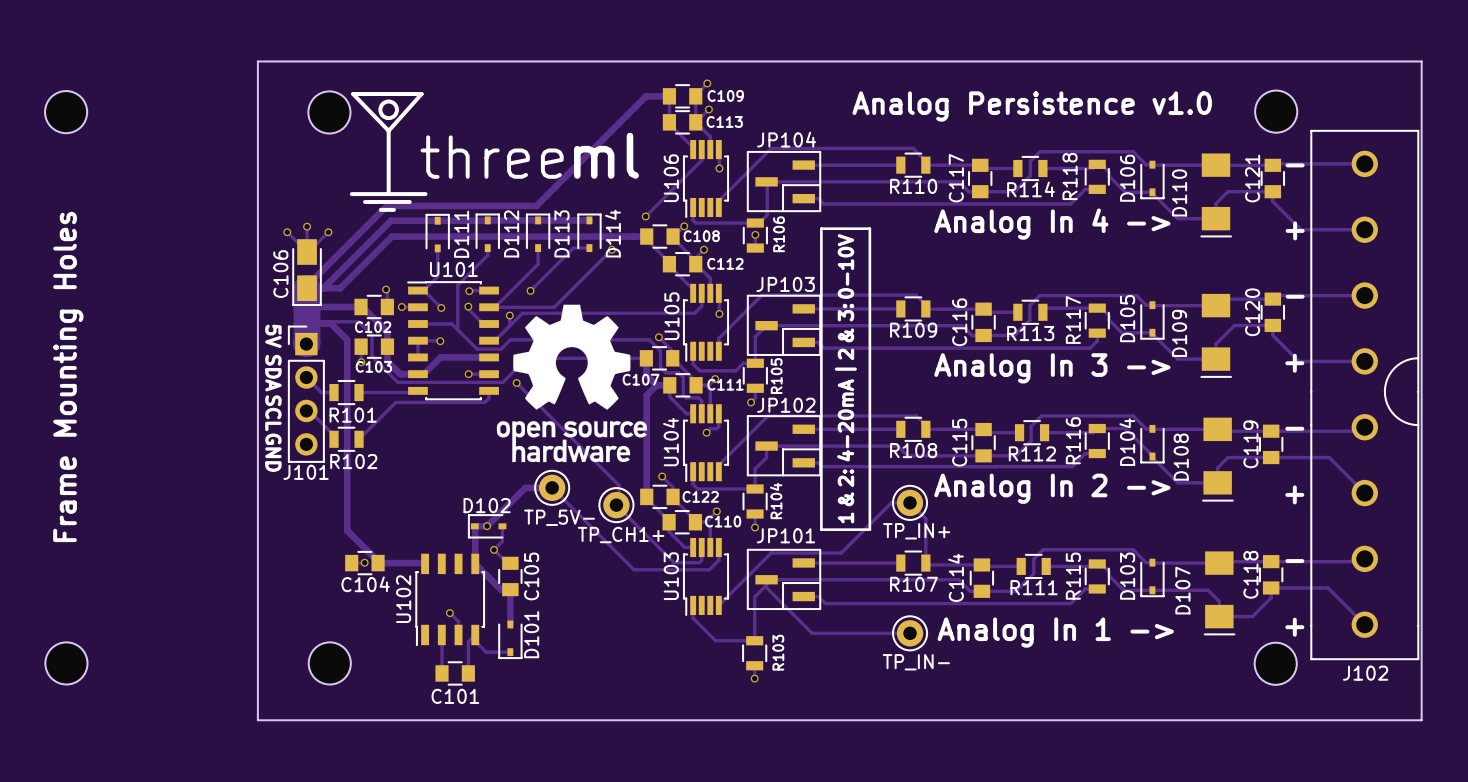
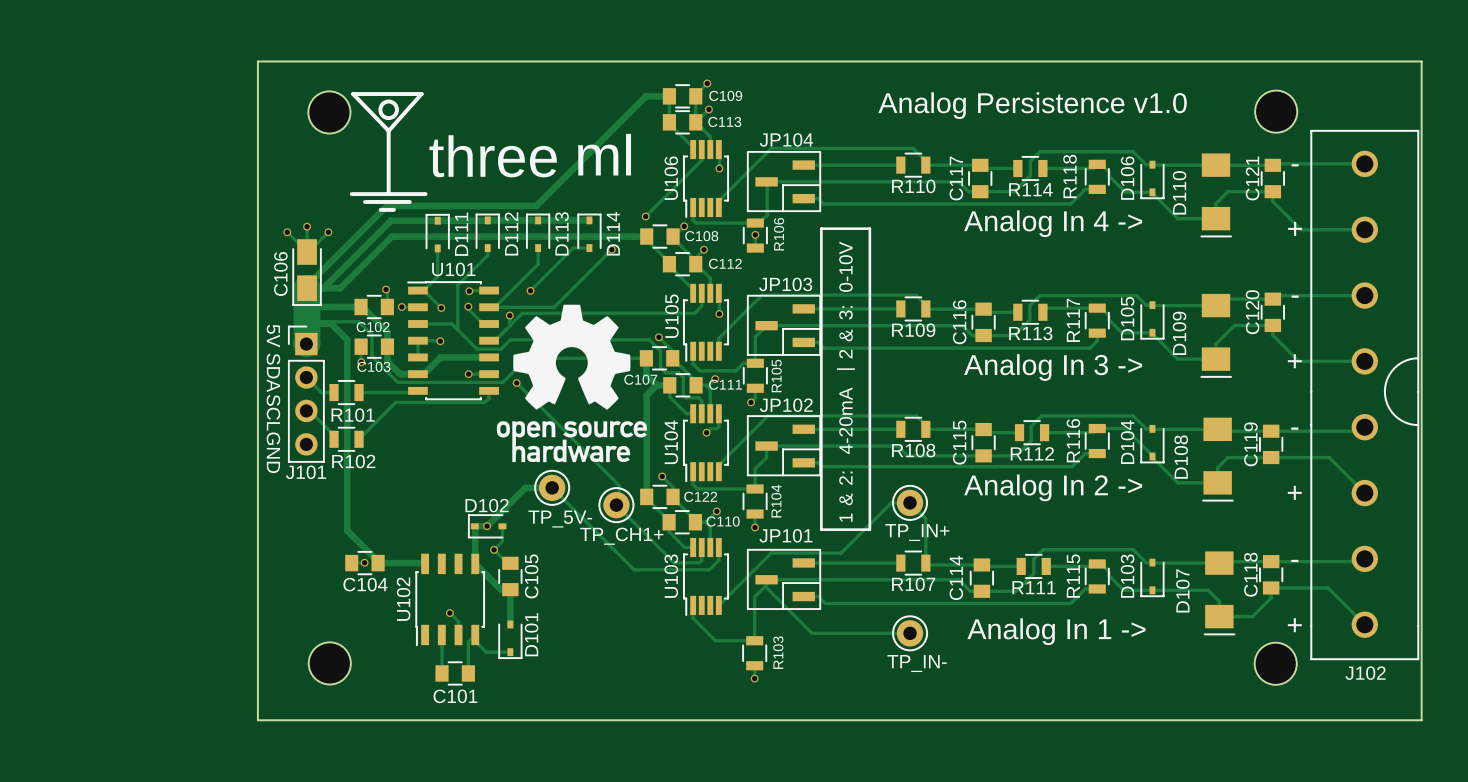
part: (66, 112) -> none
text: Frame Mounting Holes (68, 376) -> none
part: (66, 663) -> none

